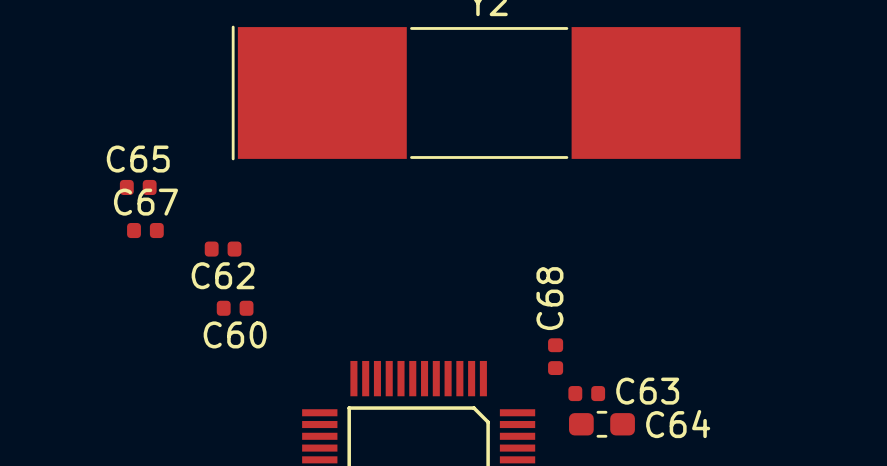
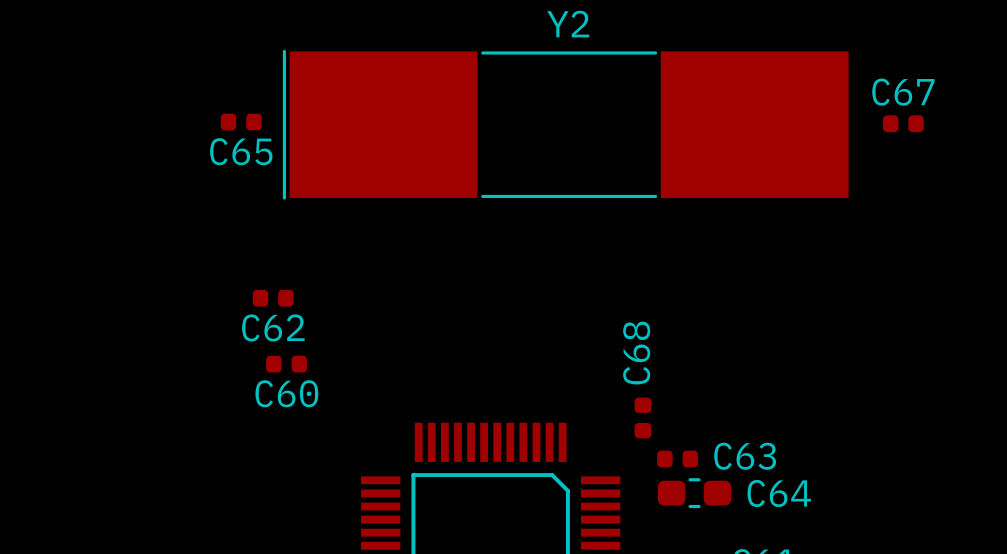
C65 name position: C65 (138, 159) -> C65 (241, 151)
C65 position: (138, 187) -> (241, 122)
C67 position: (145, 230) -> (903, 123)

